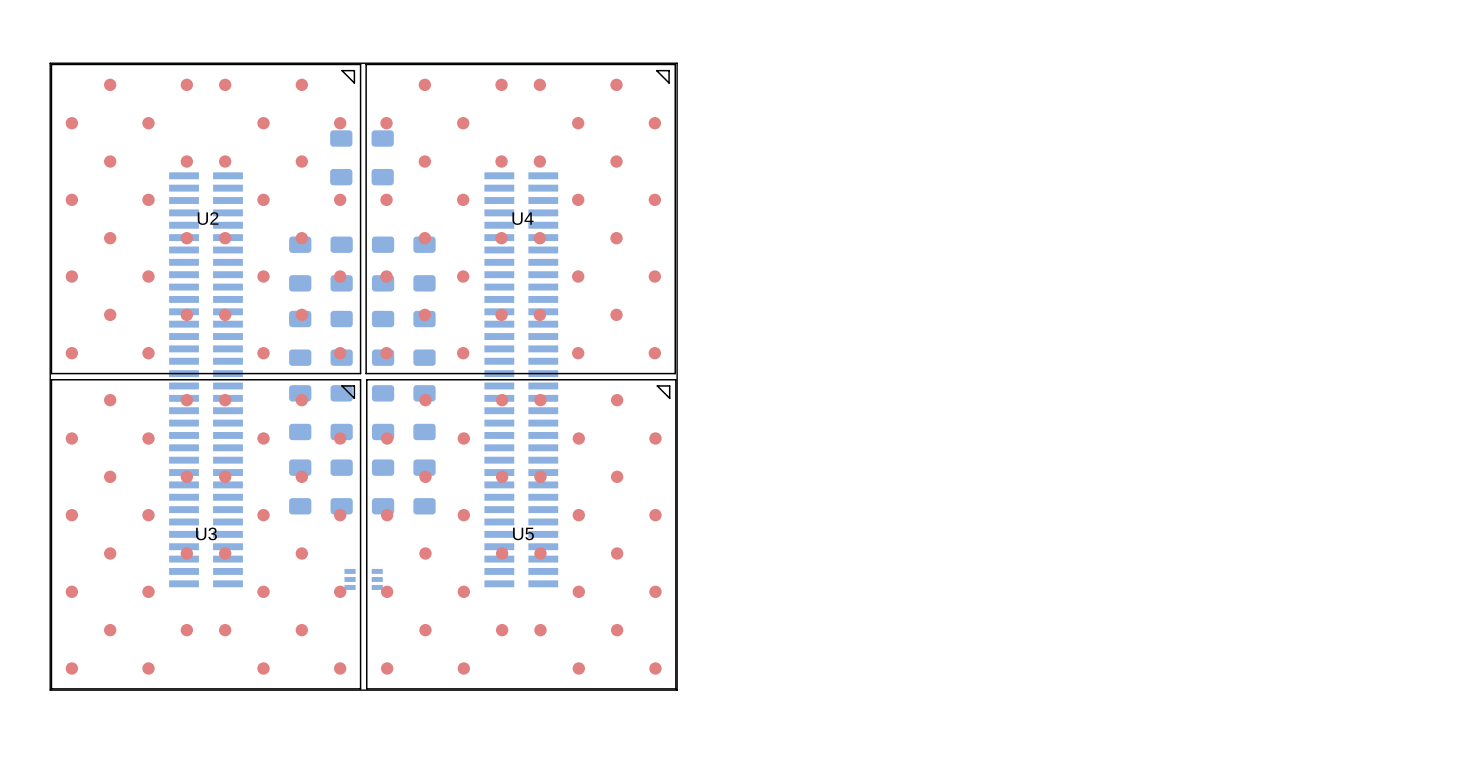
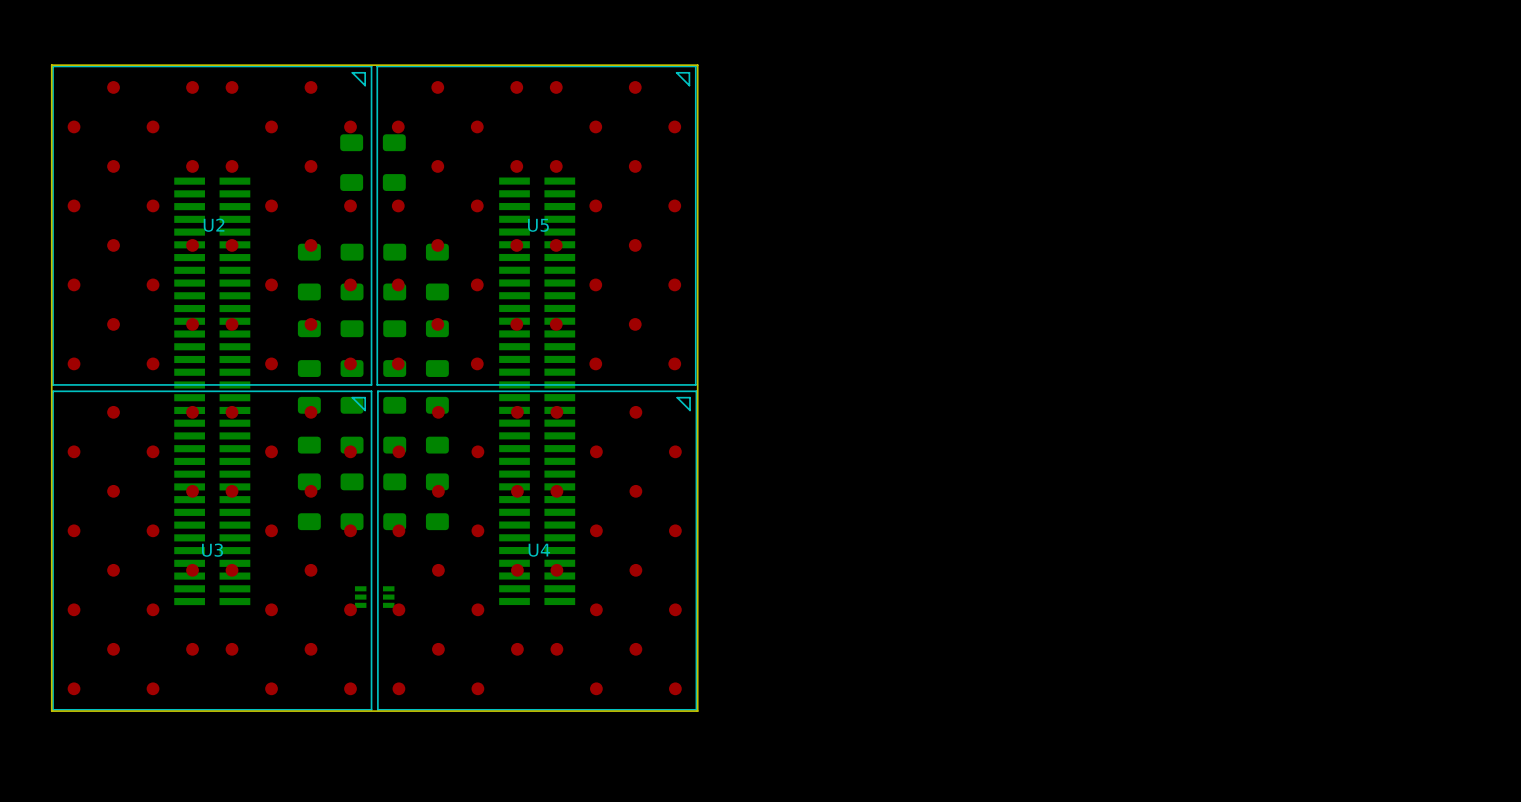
U4 name: U4 (522, 218) -> U5 (538, 225)
U5 name: U5 (523, 533) -> U4 (539, 550)

